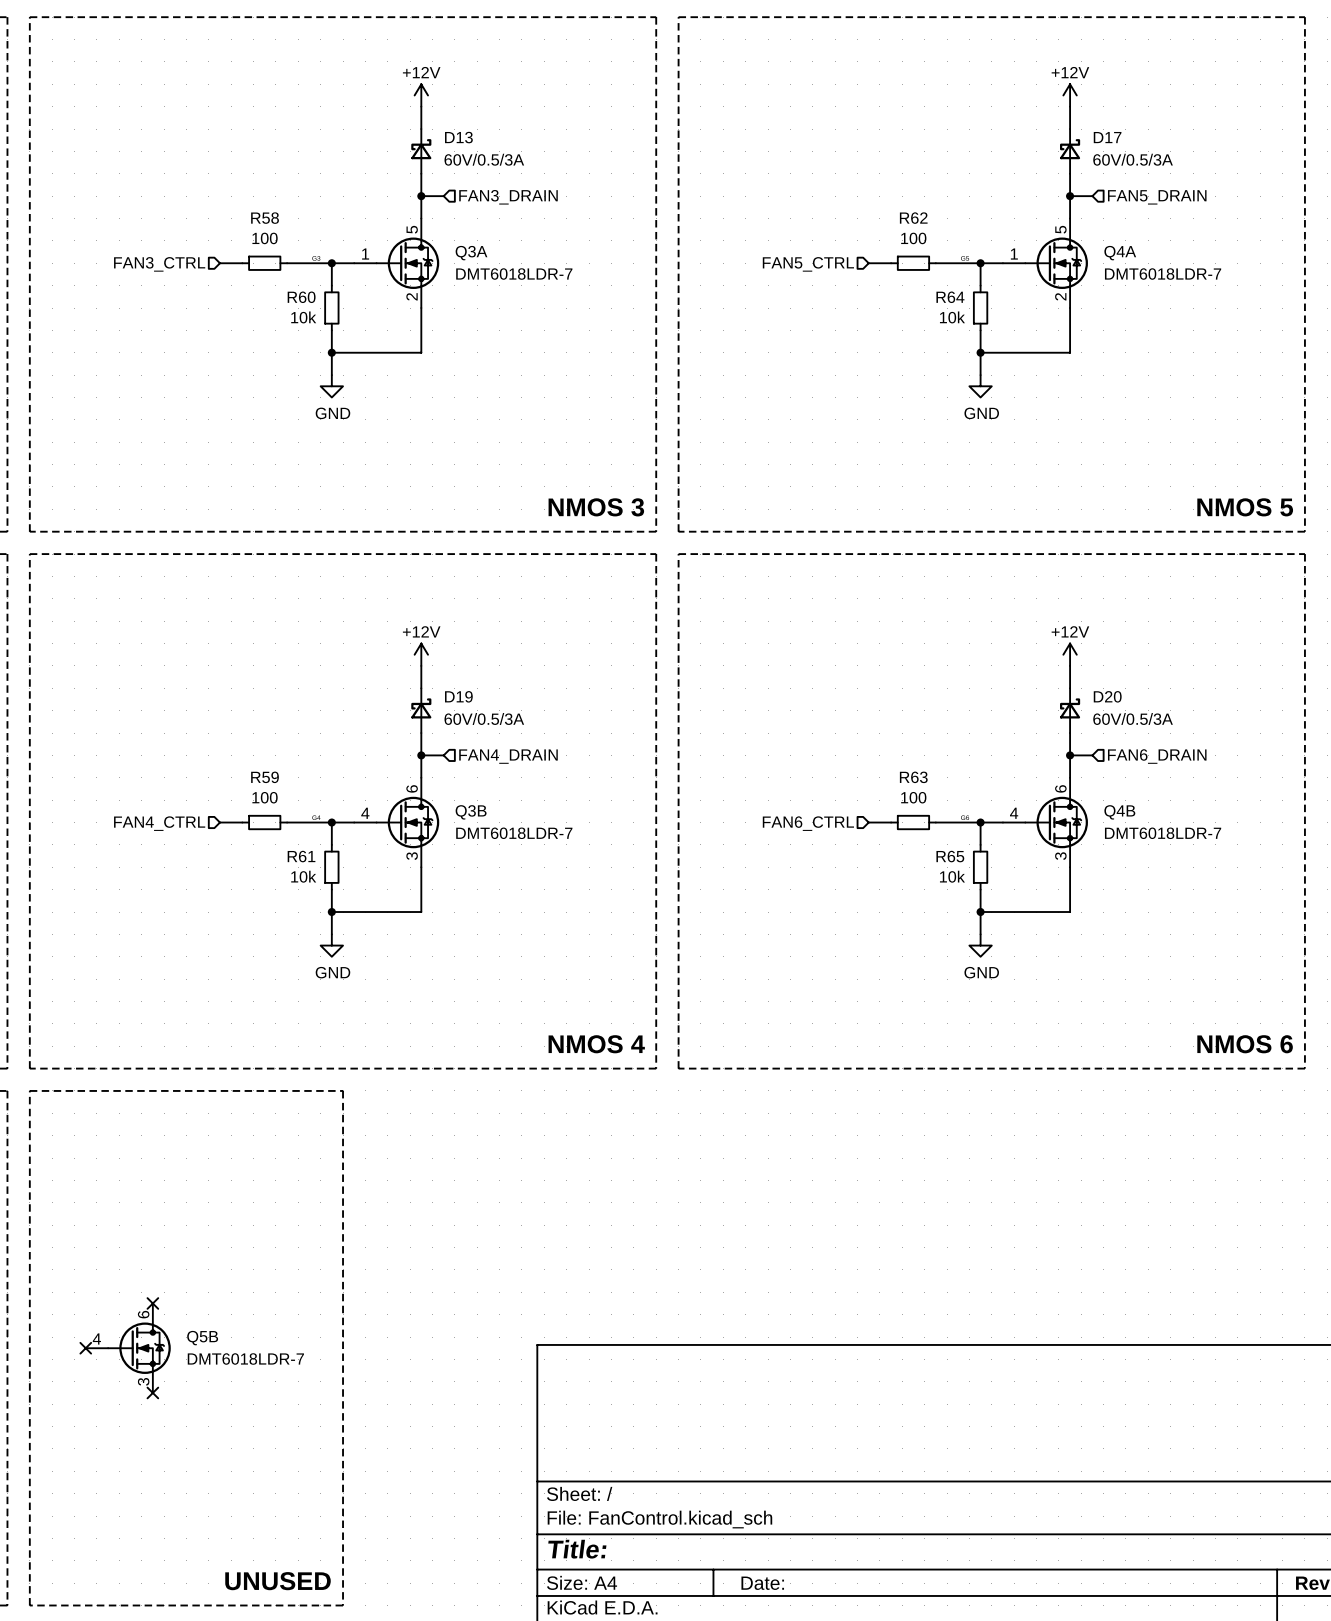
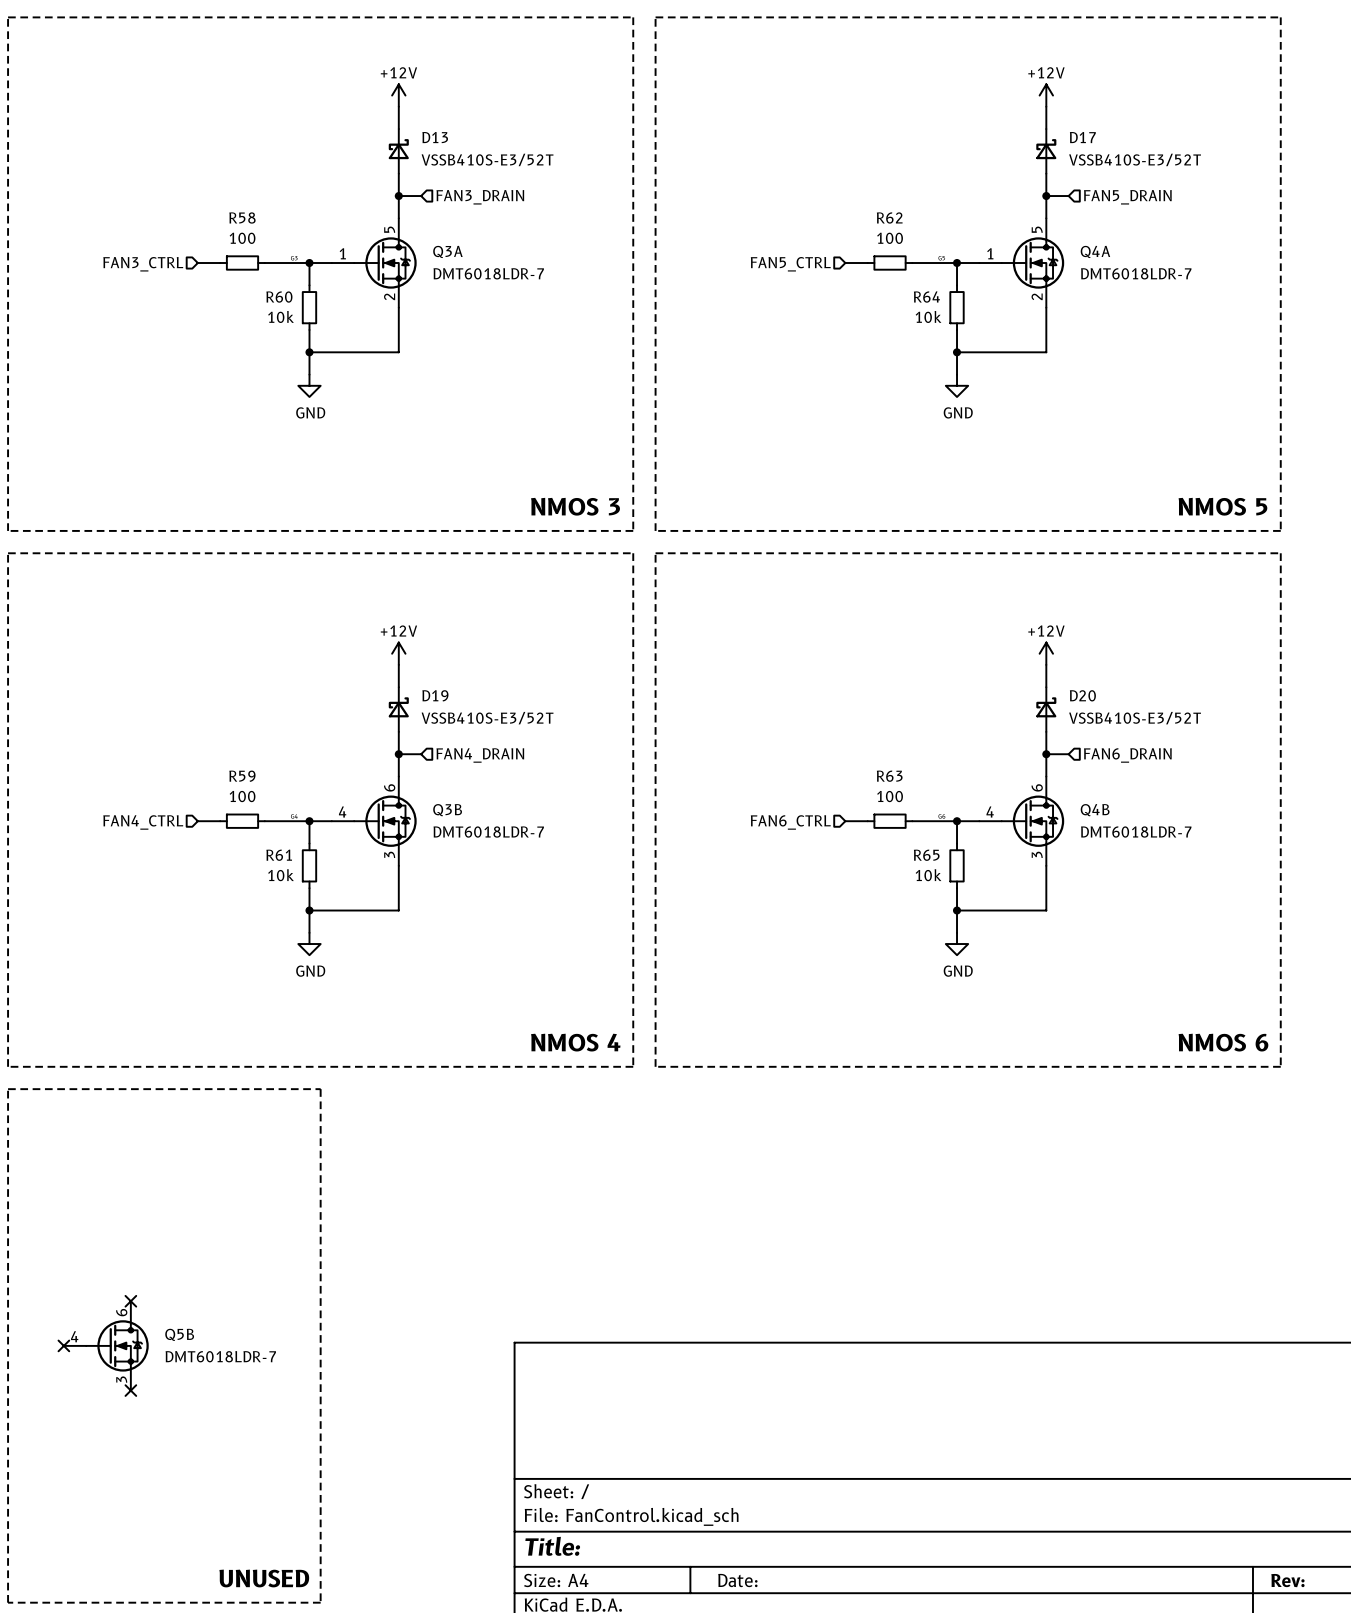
D13 value: 60V/0.5/3A (484, 159) -> VSSB410S-E3/52T (487, 159)
D17 value: 60V/0.5/3A (1133, 159) -> VSSB410S-E3/52T (1135, 159)
D19 value: 60V/0.5/3A (484, 718) -> VSSB410S-E3/52T (487, 718)
D20 value: 60V/0.5/3A (1133, 718) -> VSSB410S-E3/52T (1135, 718)

